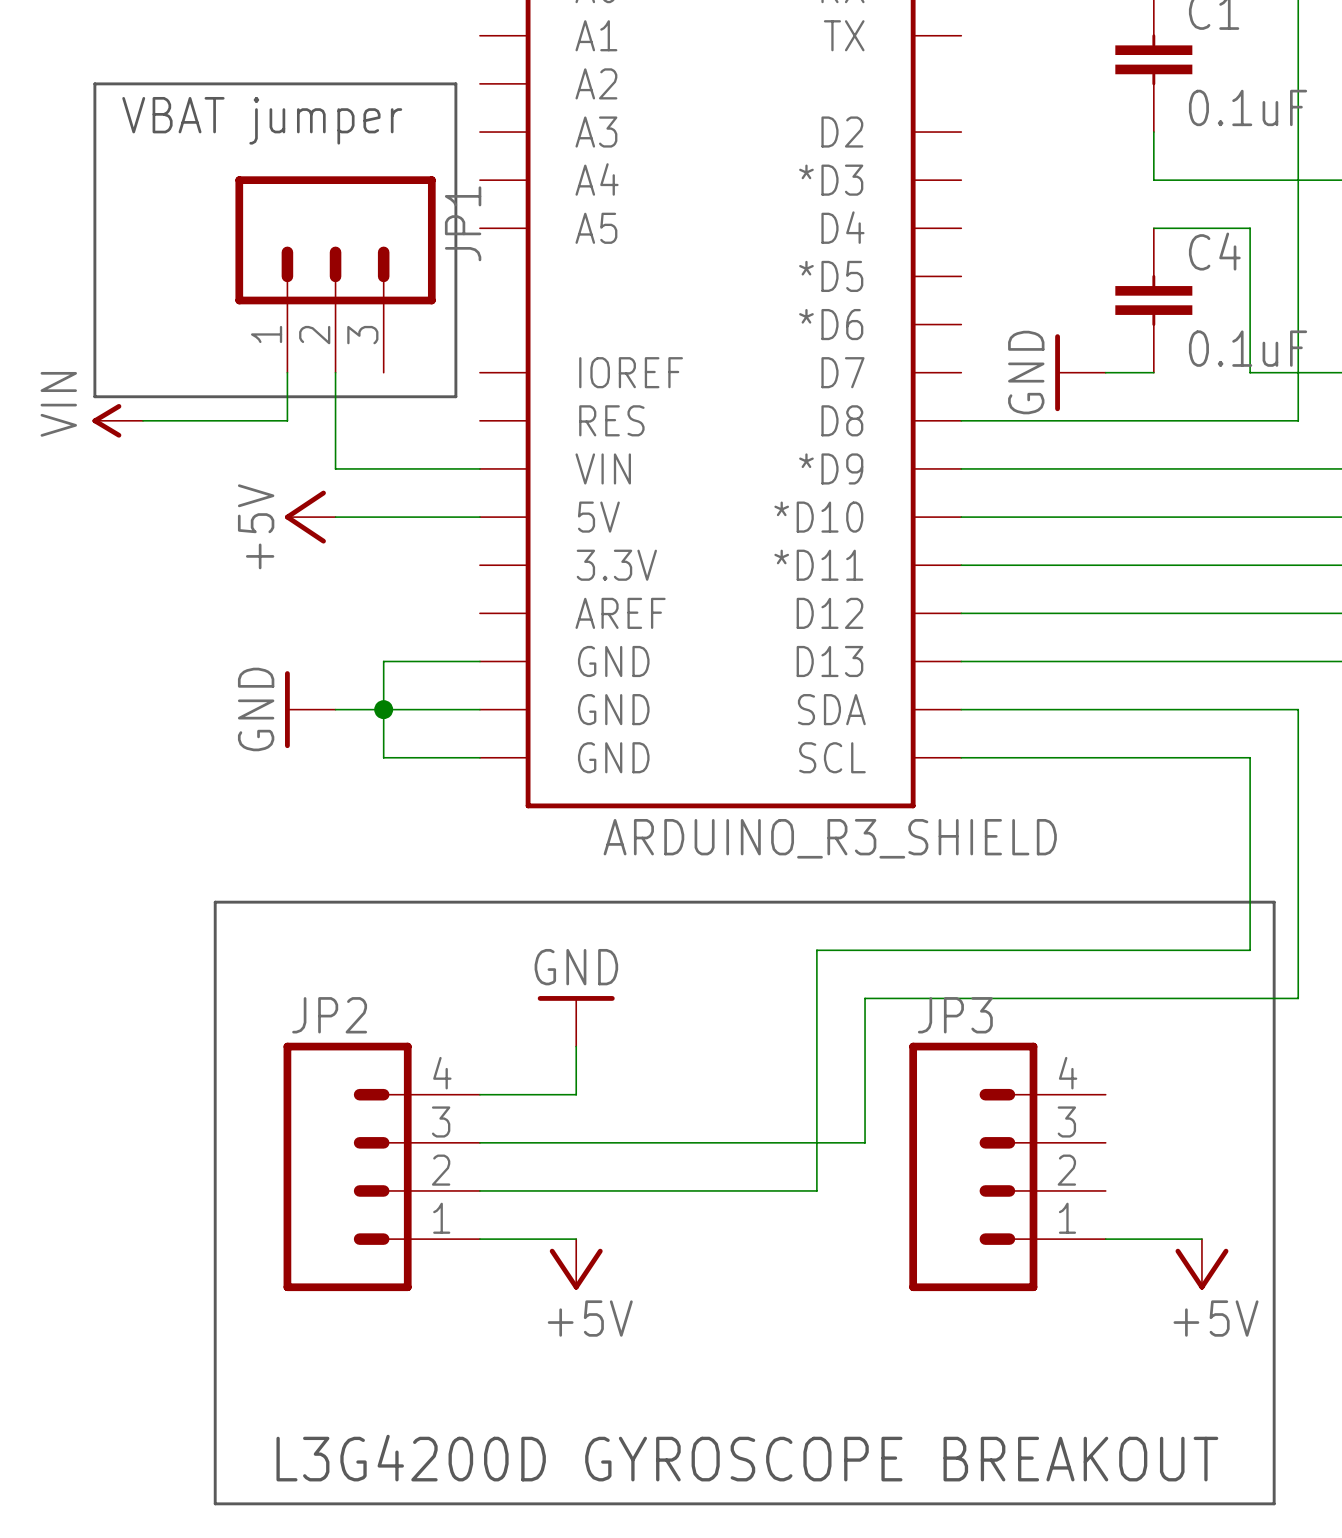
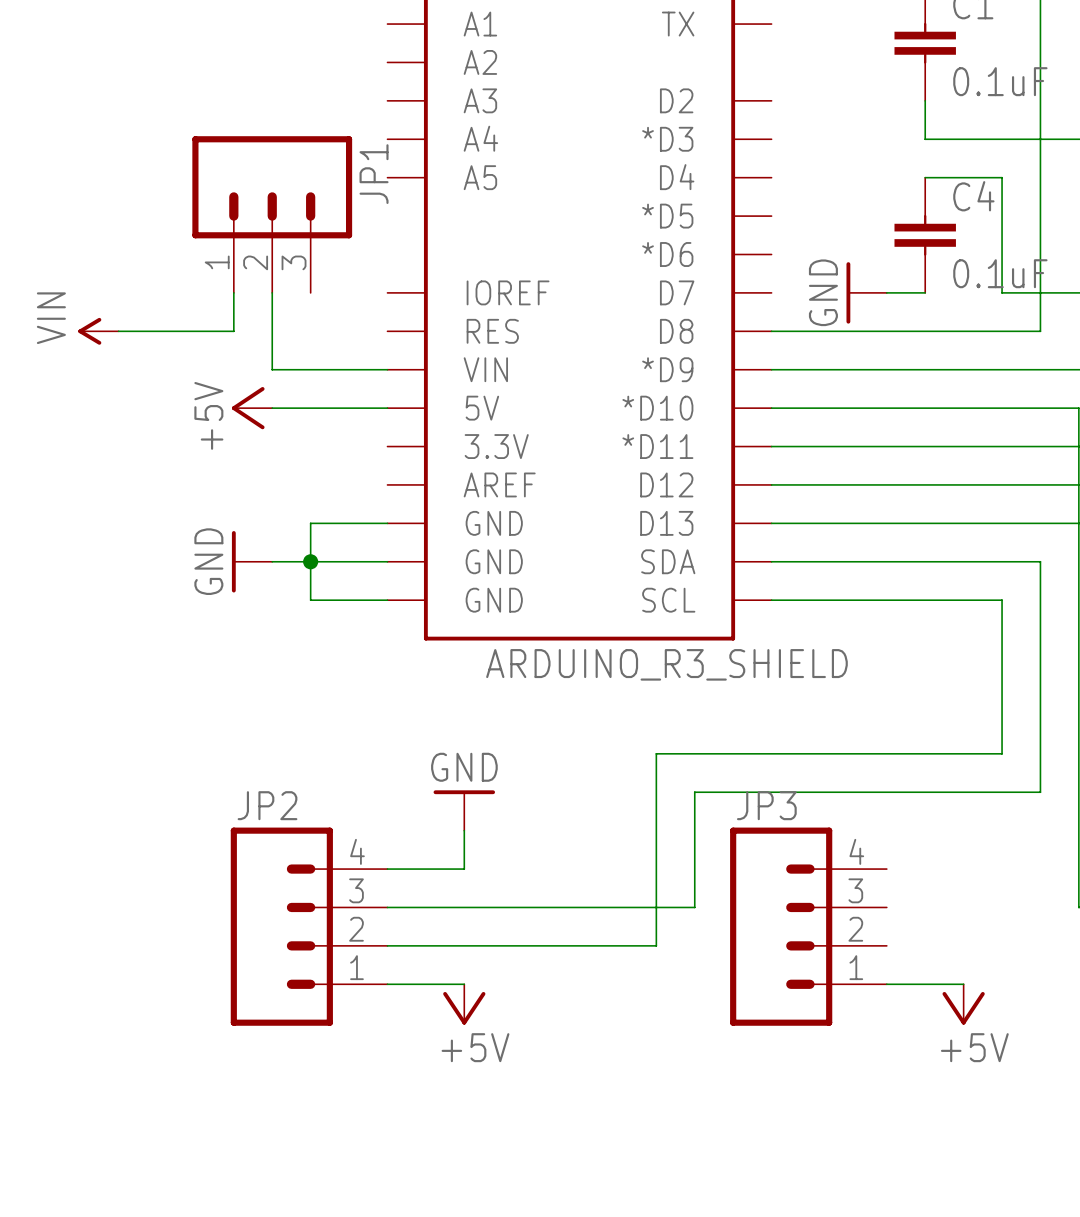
line: (94, 83) (455, 83) (455, 396) (94, 396) (94, 83) -> none
text: VBAT jumper (262, 120) -> none
line: (215, 902) (1274, 902) (1274, 1503) (215, 1503) (215, 902) -> none
text: L3G4200D GYROSCOPE BREAKOUT (747, 1458) -> none

